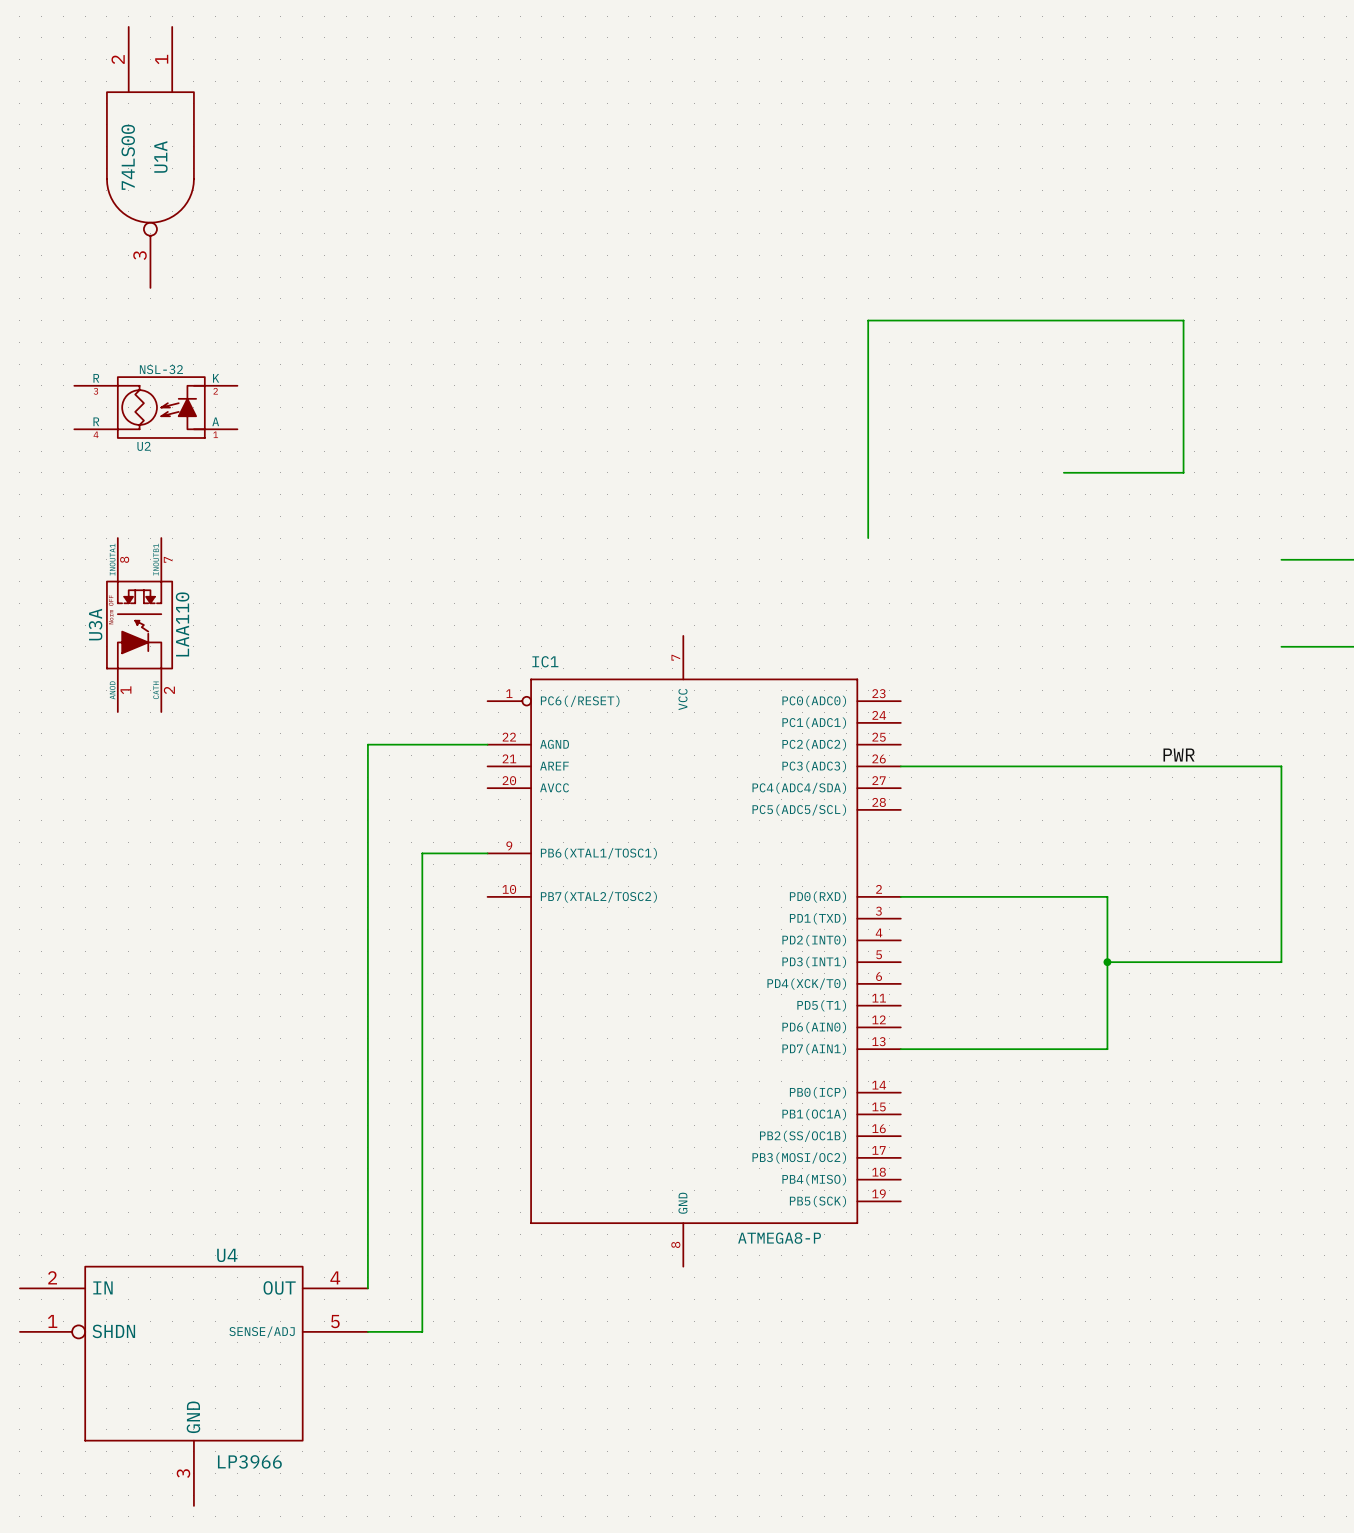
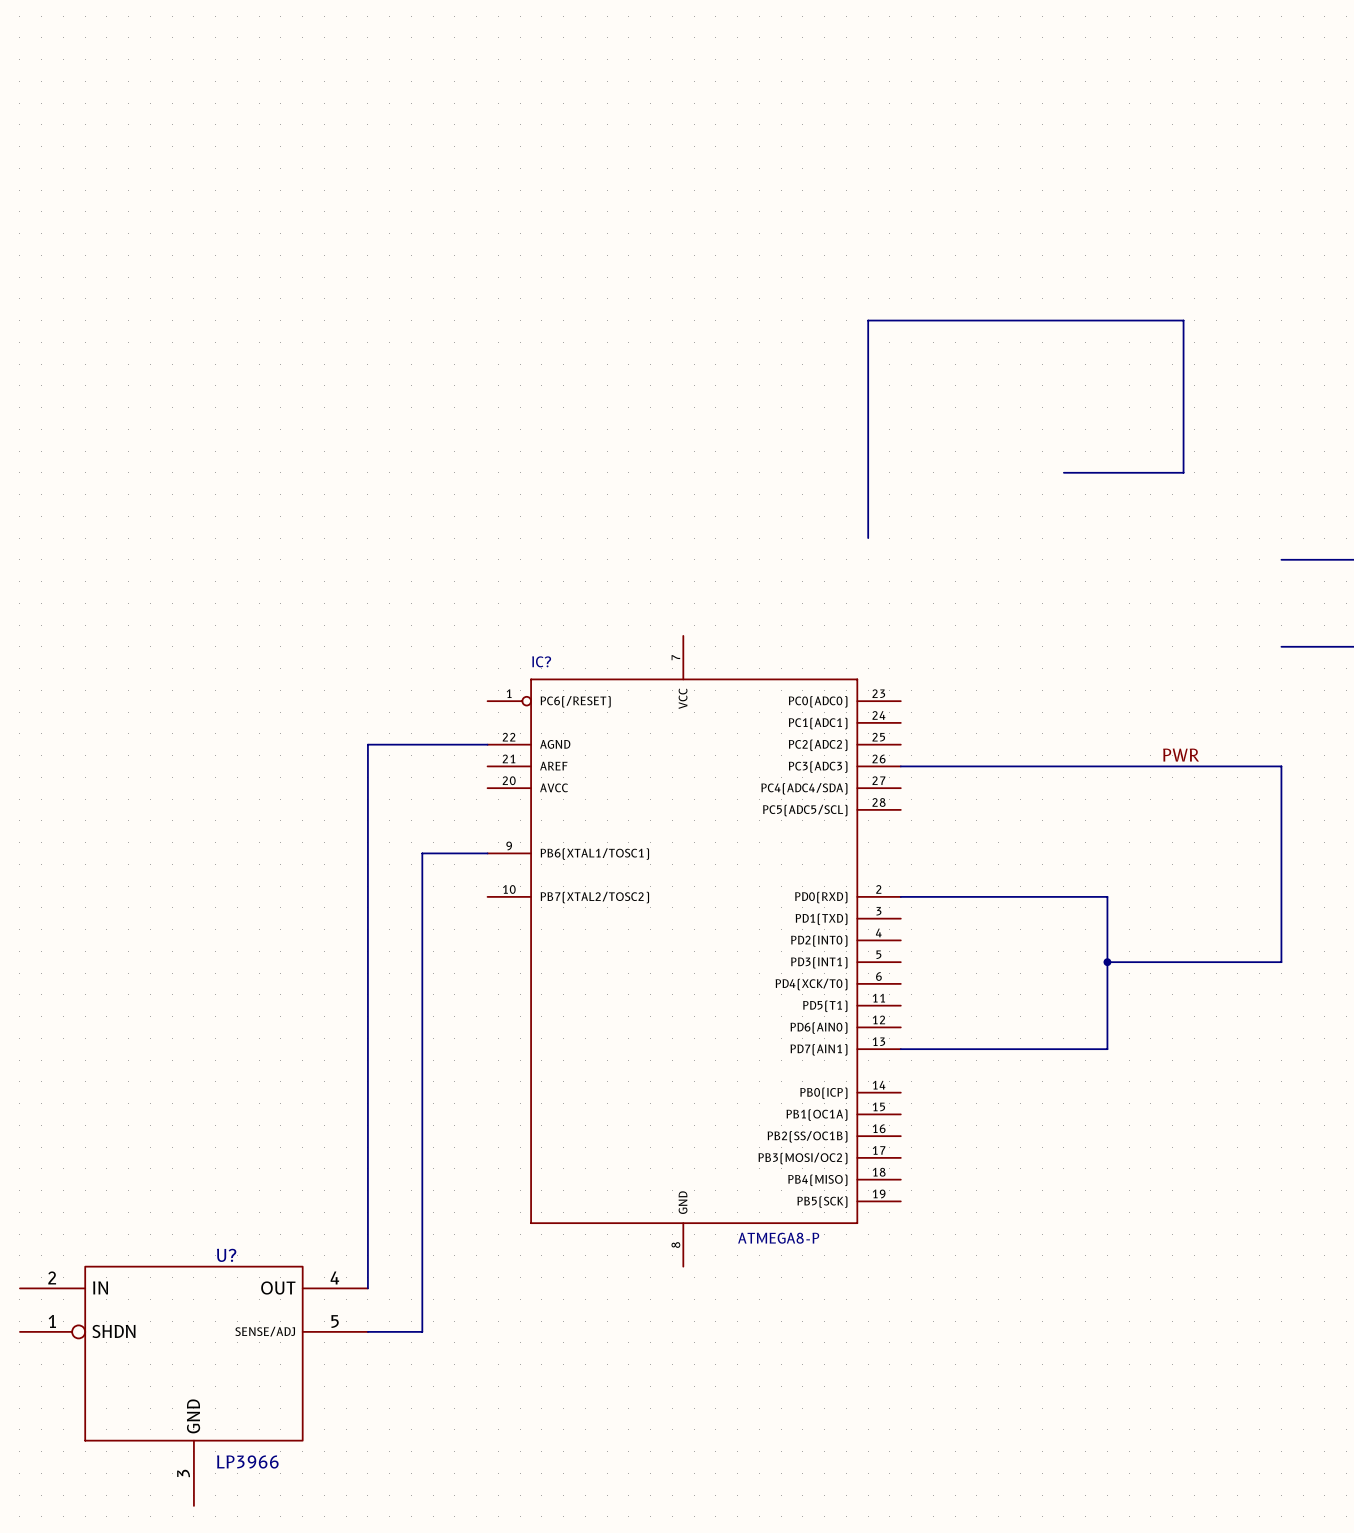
U1A: 74LS00 (150, 157) -> none
U2: NSL-32 (155, 407) -> none
U3A: LAA110 (139, 625) -> none
IC1 name: IC1 (545, 661) -> IC? (541, 661)
U4 name: U4 (227, 1255) -> U? (226, 1255)

